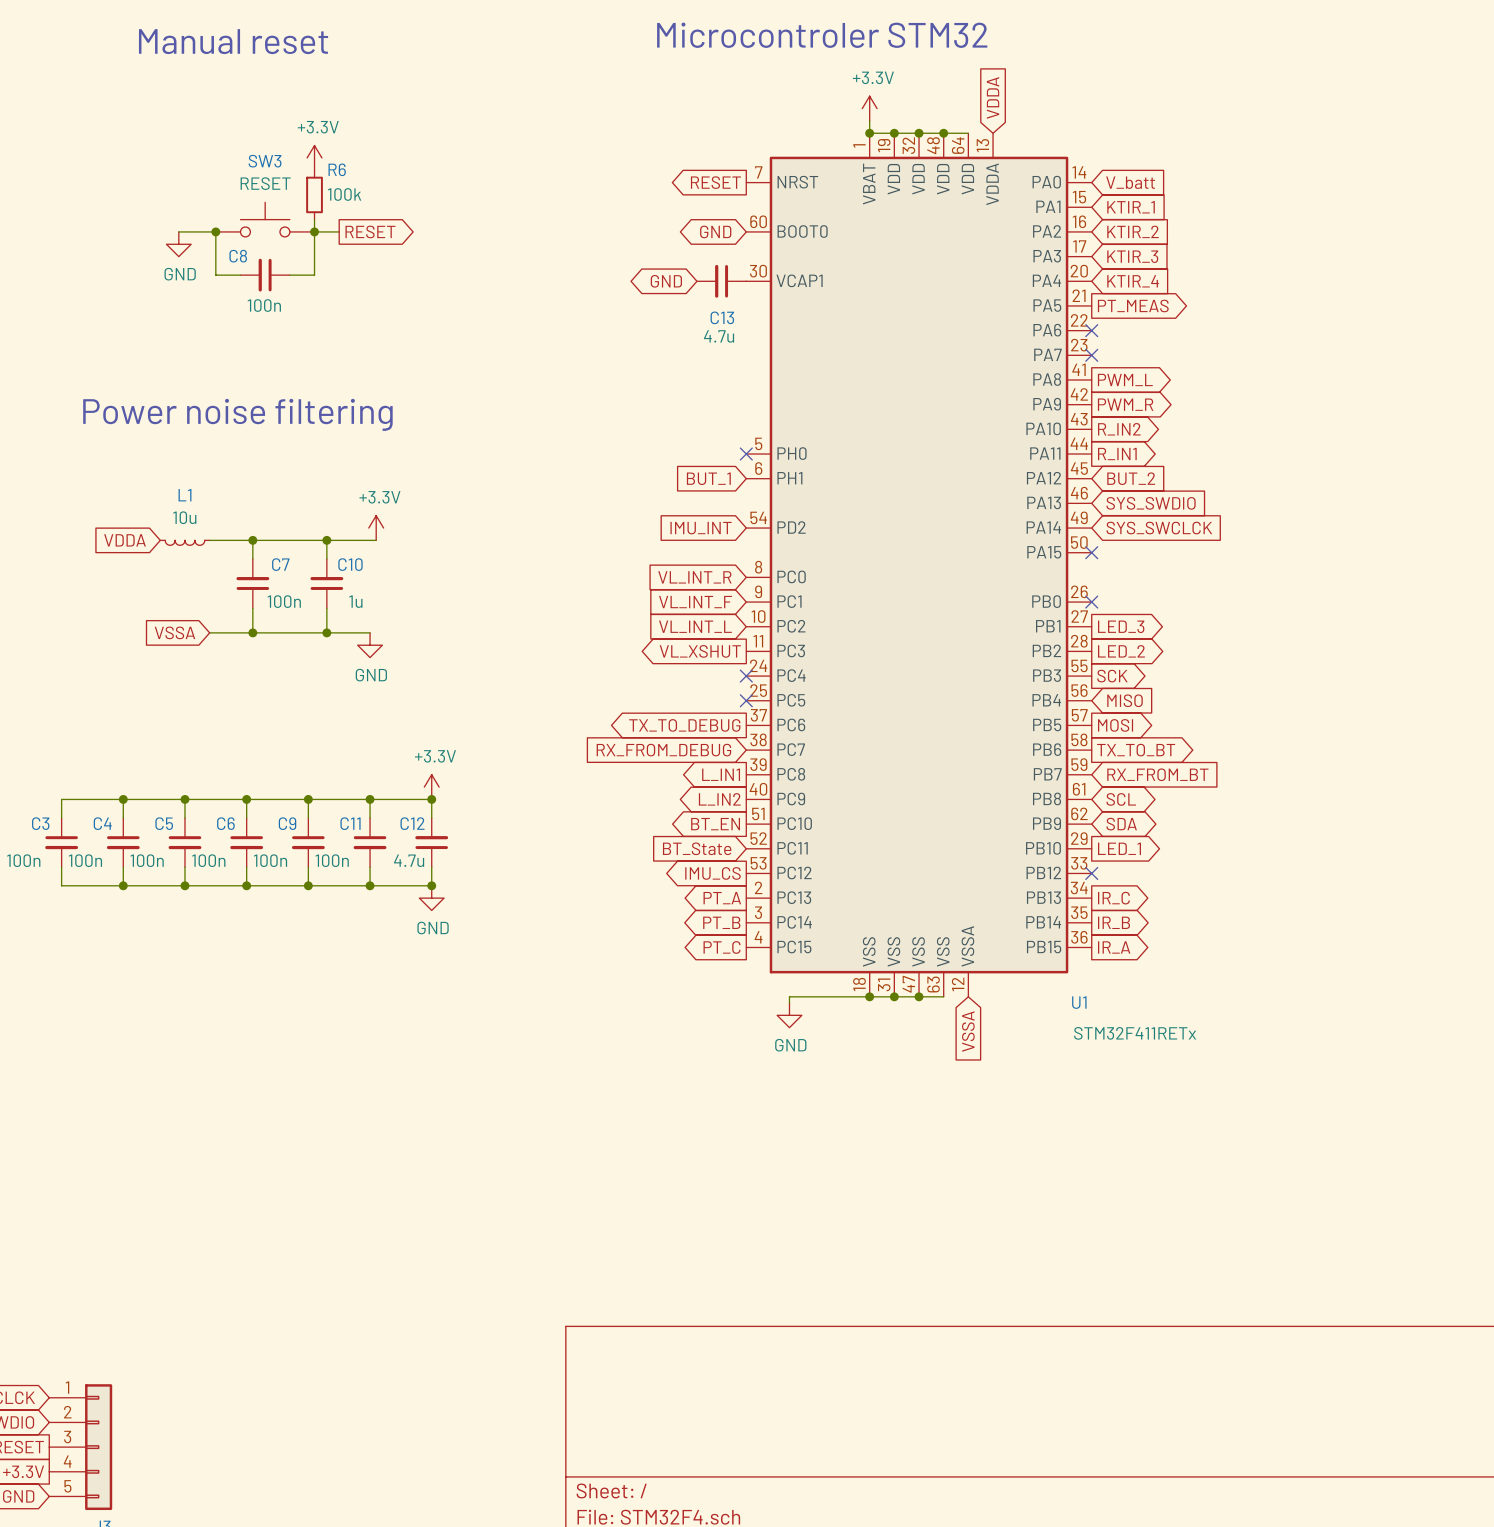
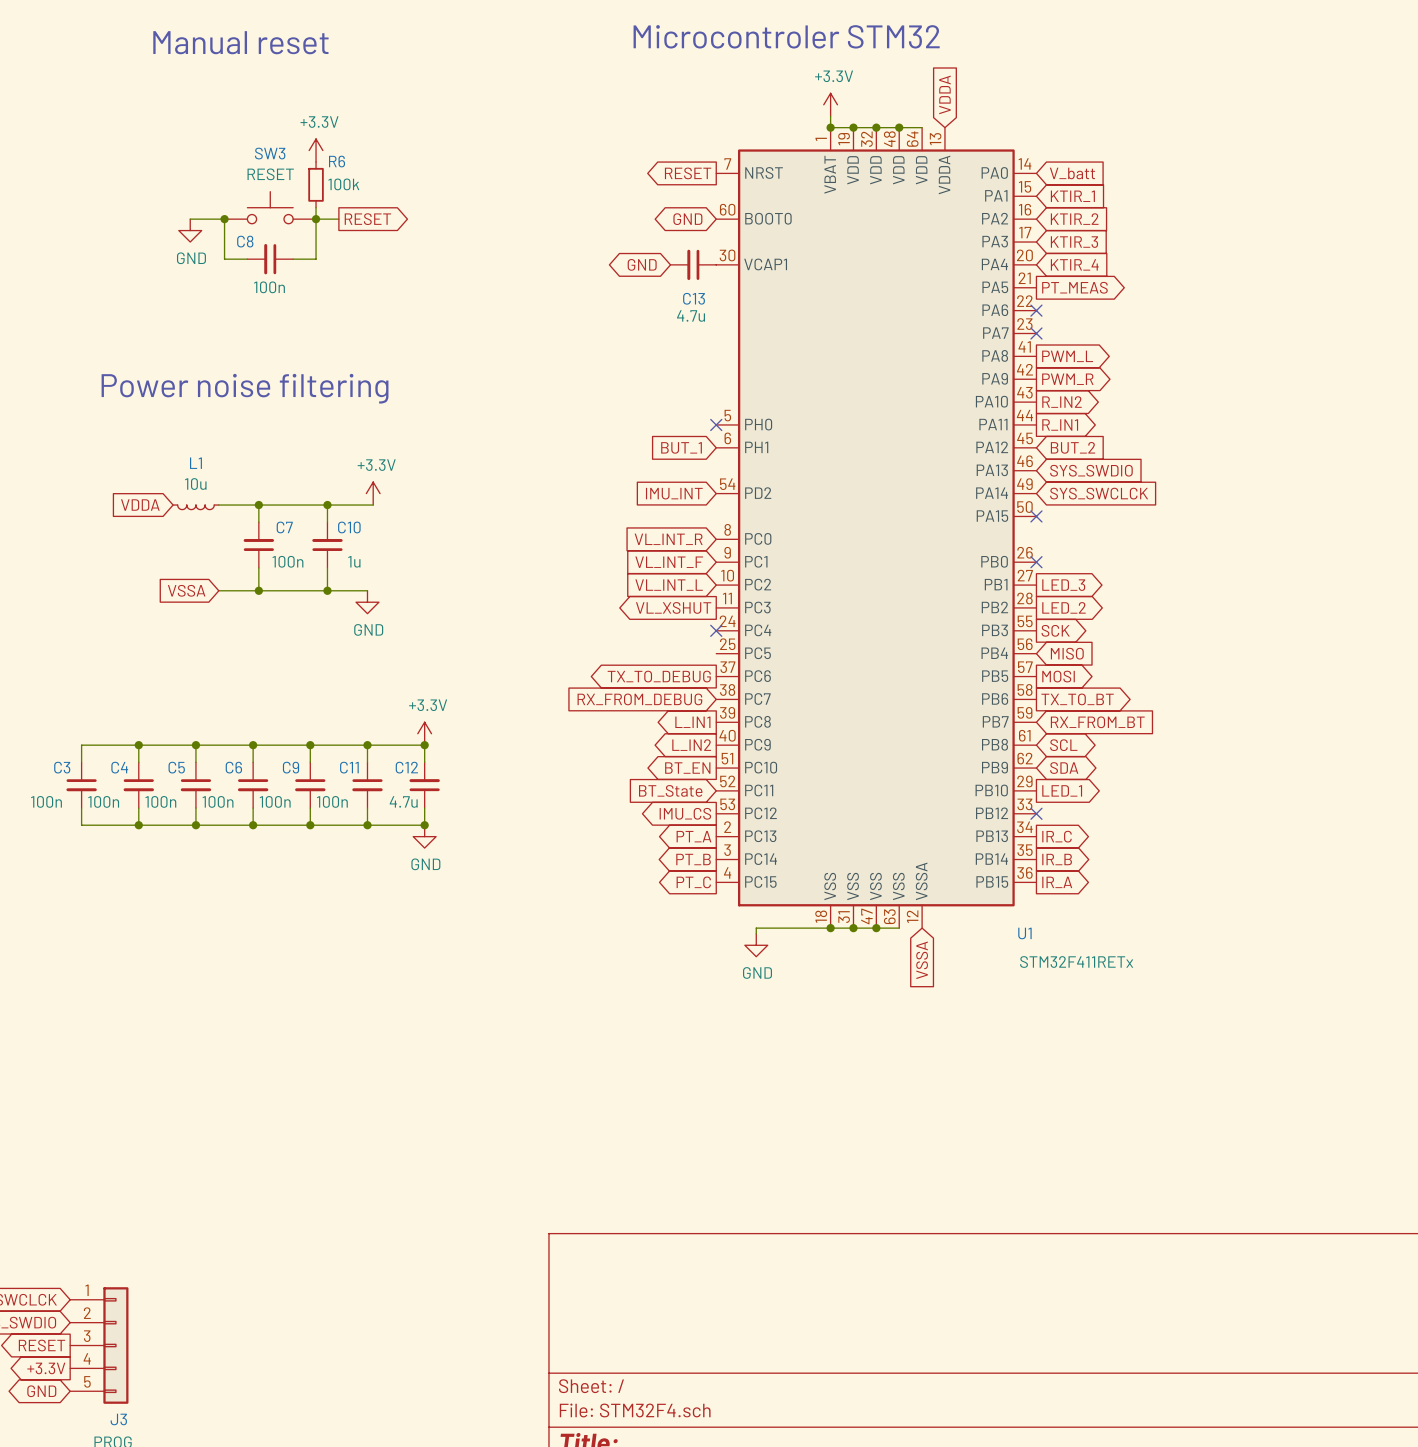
no-connect mark: (746, 700) -> none

